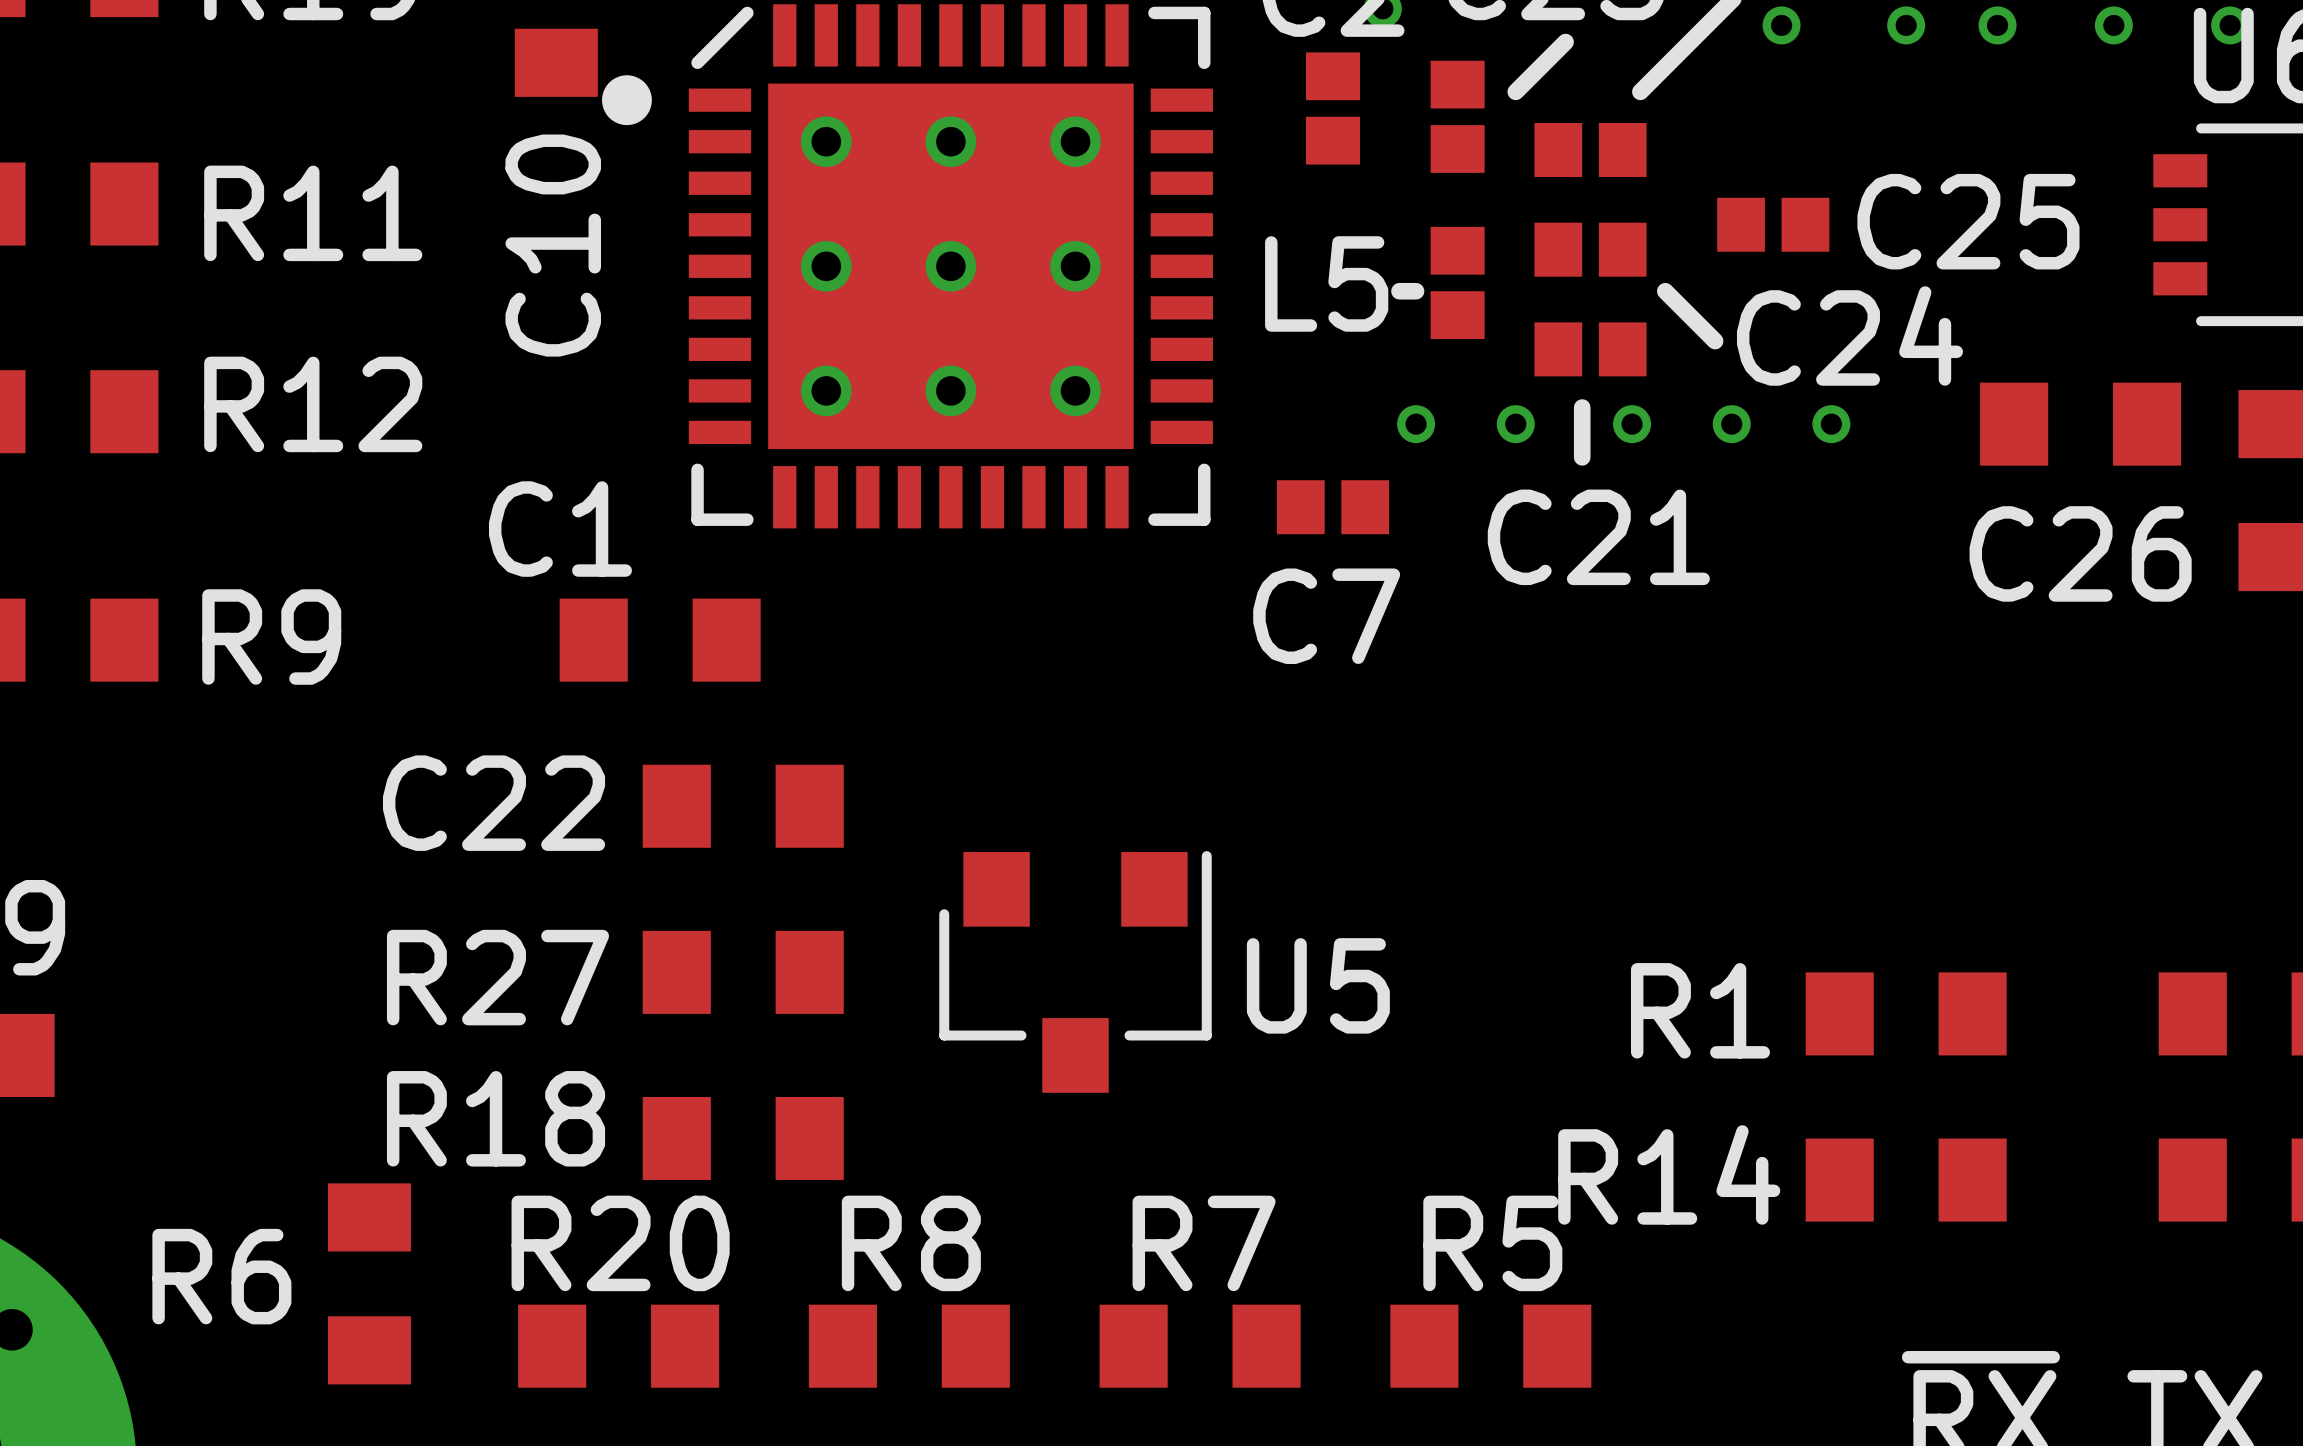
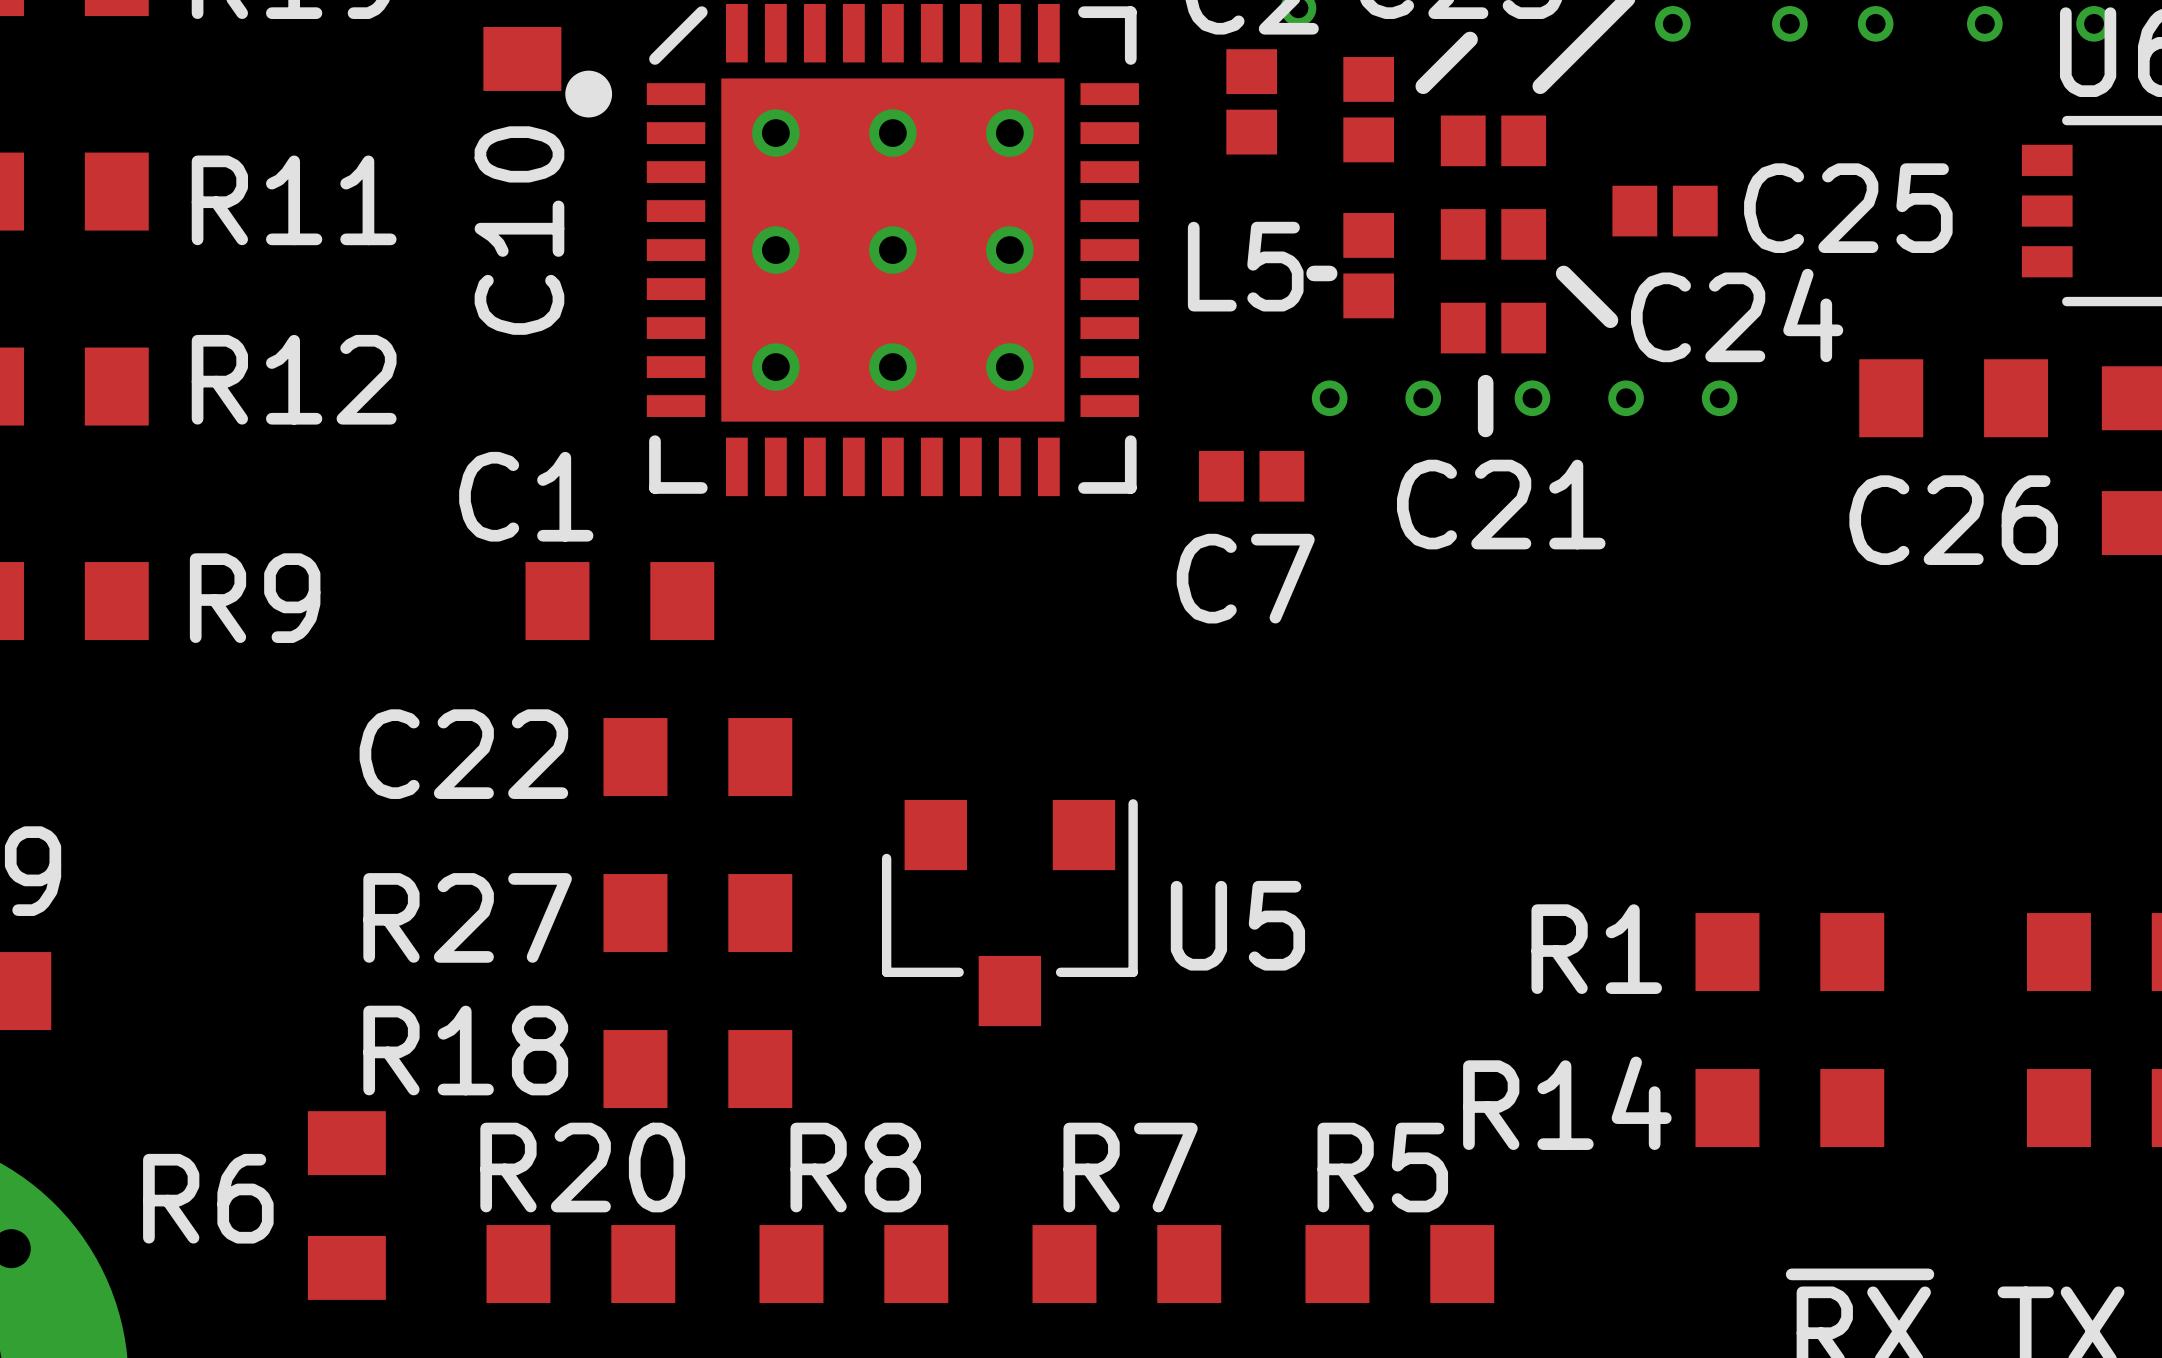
R5 name position: R5 (1492, 1243) -> R5 (1382, 1167)

